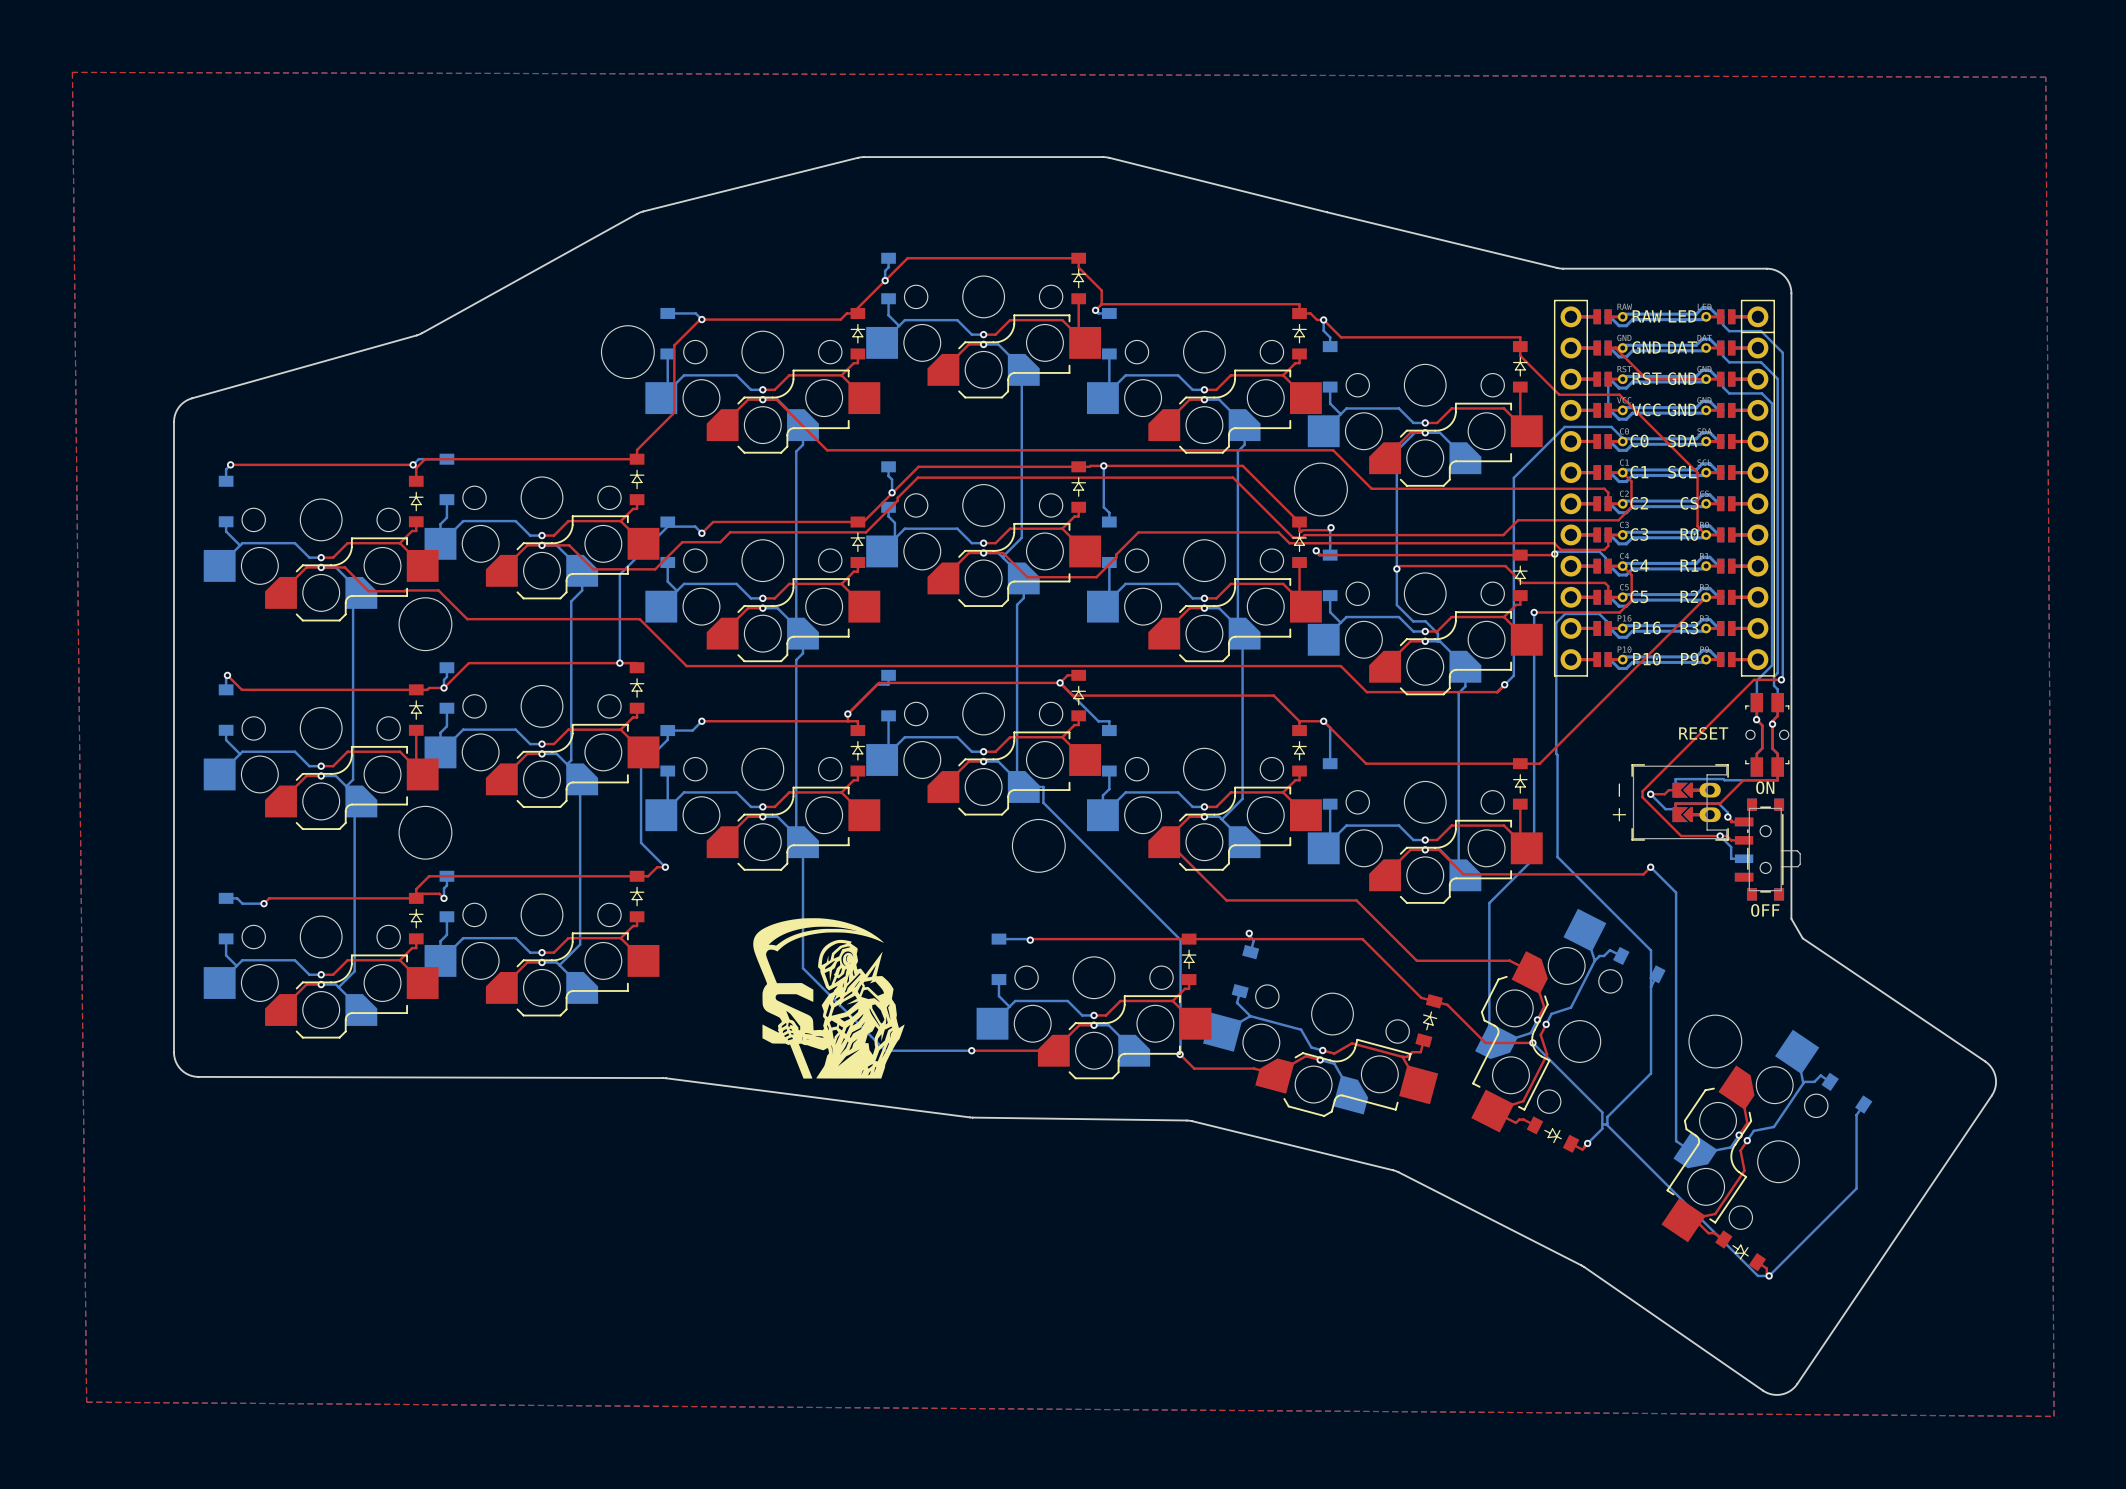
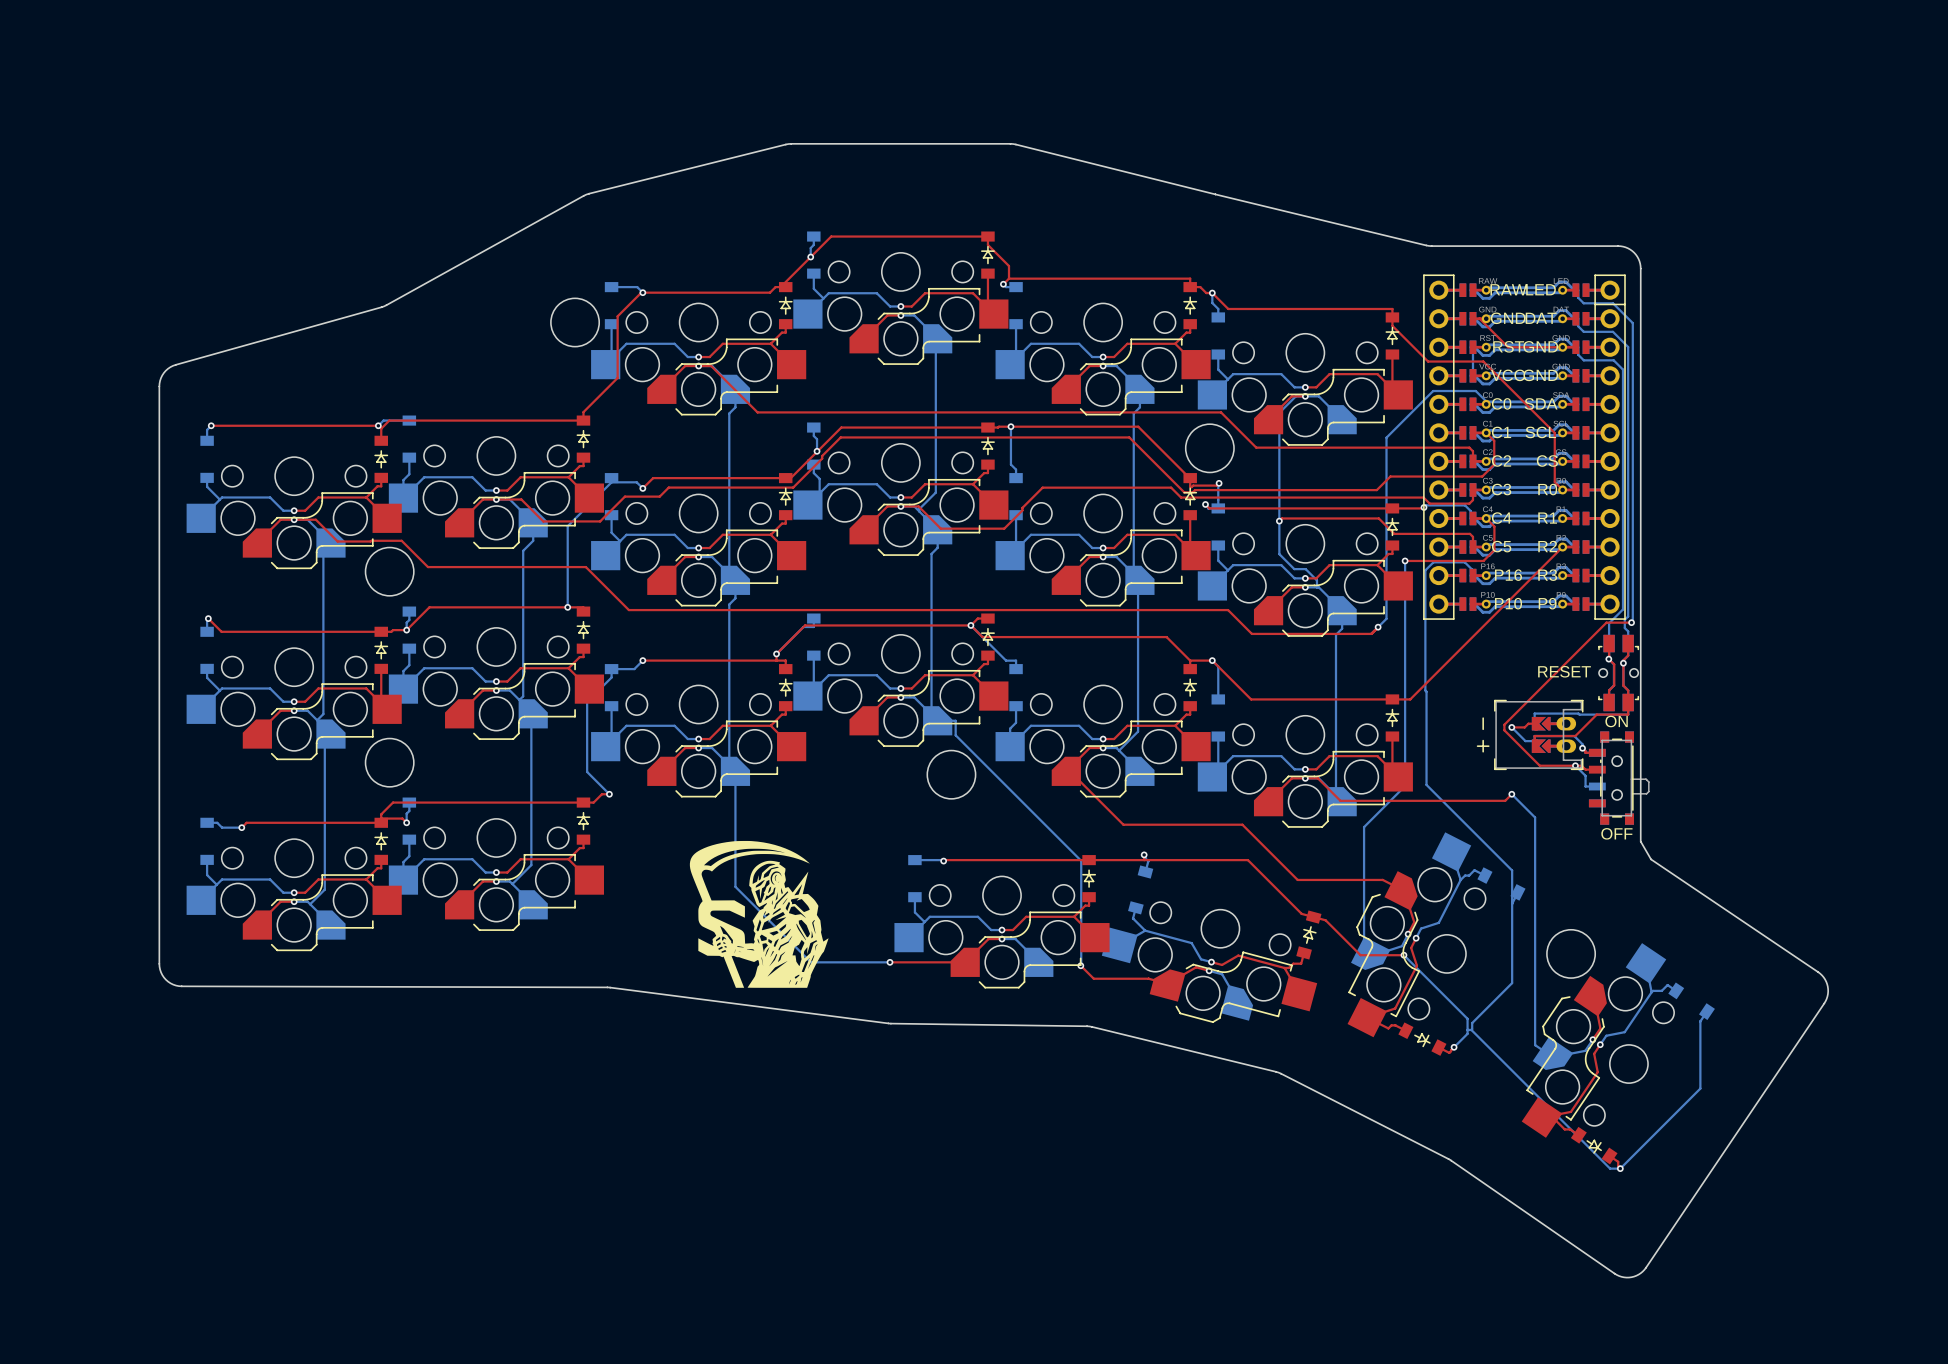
top zone outline: (72, 72) (2045, 77) (2054, 1416) (86, 1402) (72, 72) -> none

